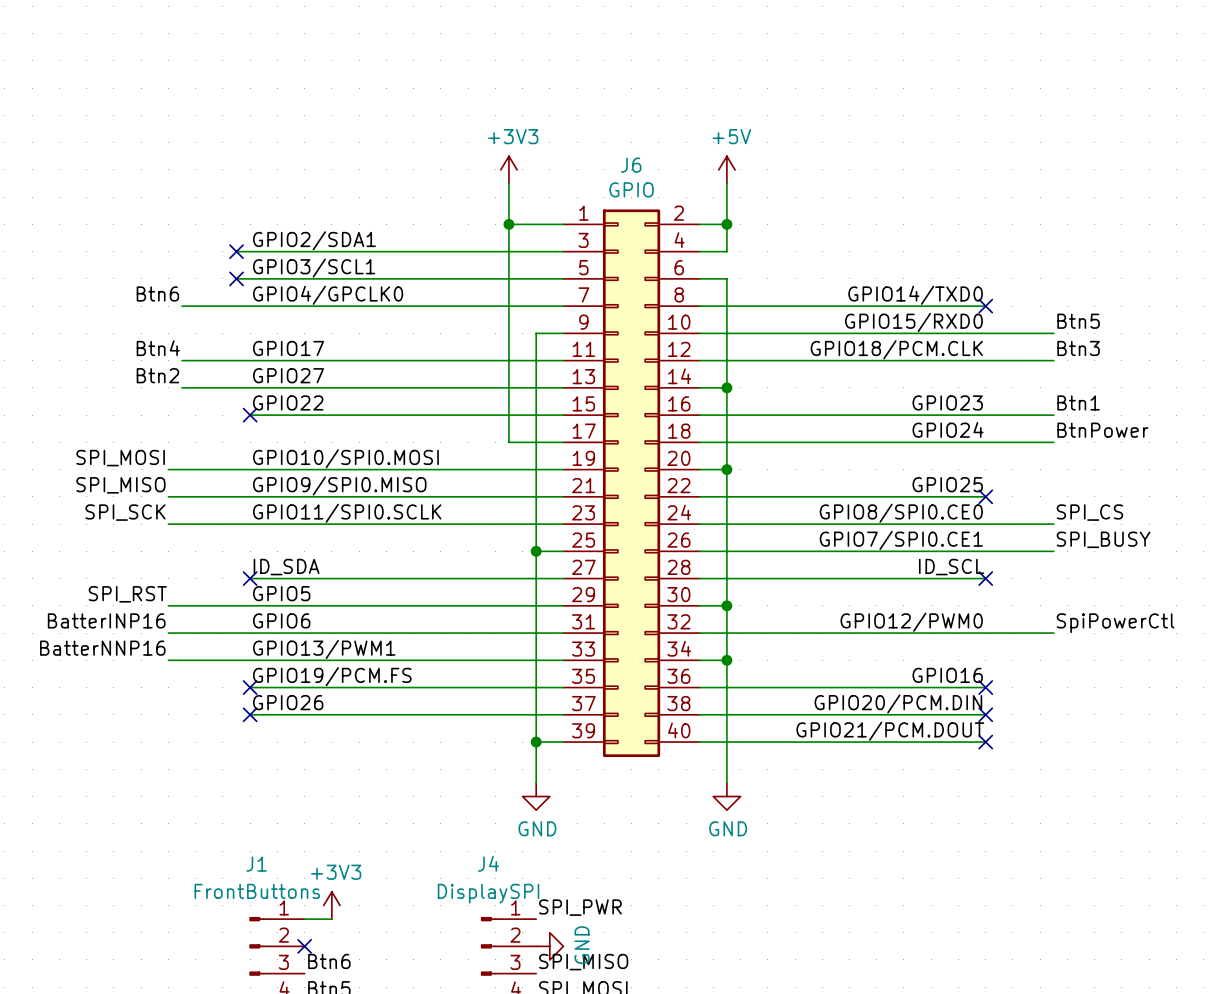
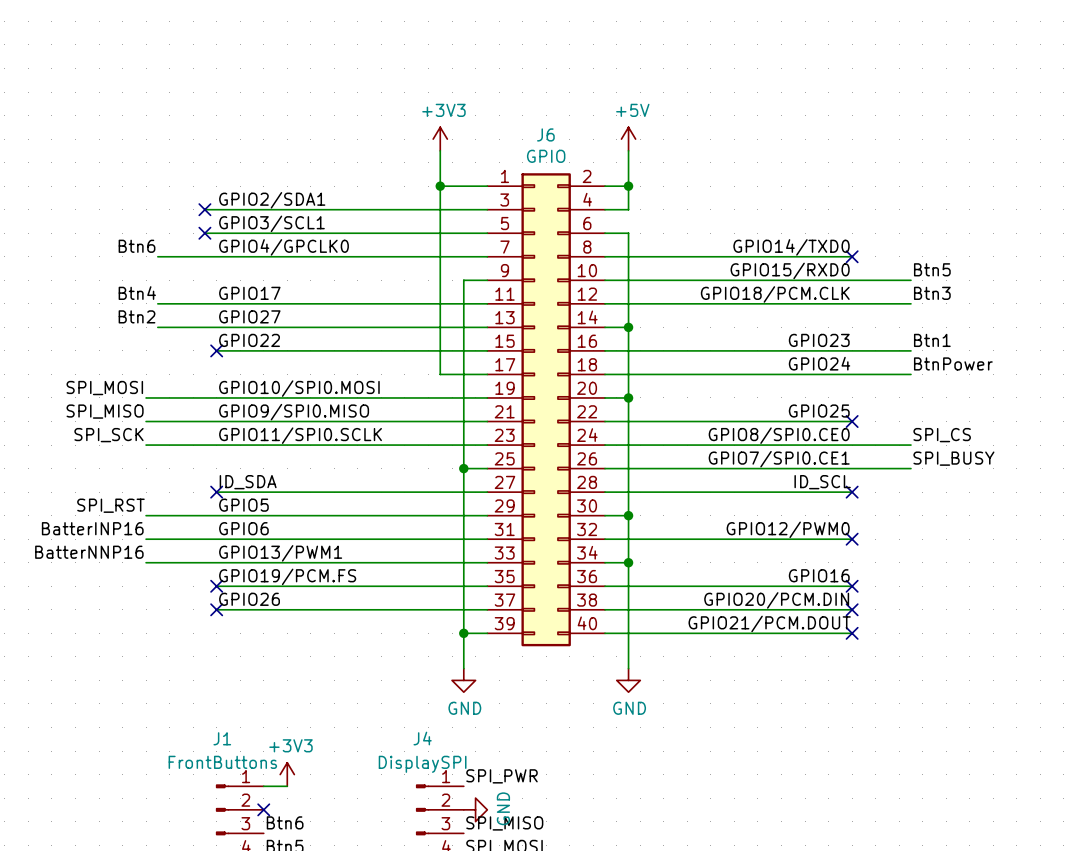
label: SpiPowerCtl (1115, 623) -> none
wire: (985, 633) (1053, 633) -> none
no-connect mark: none -> (852, 539)

